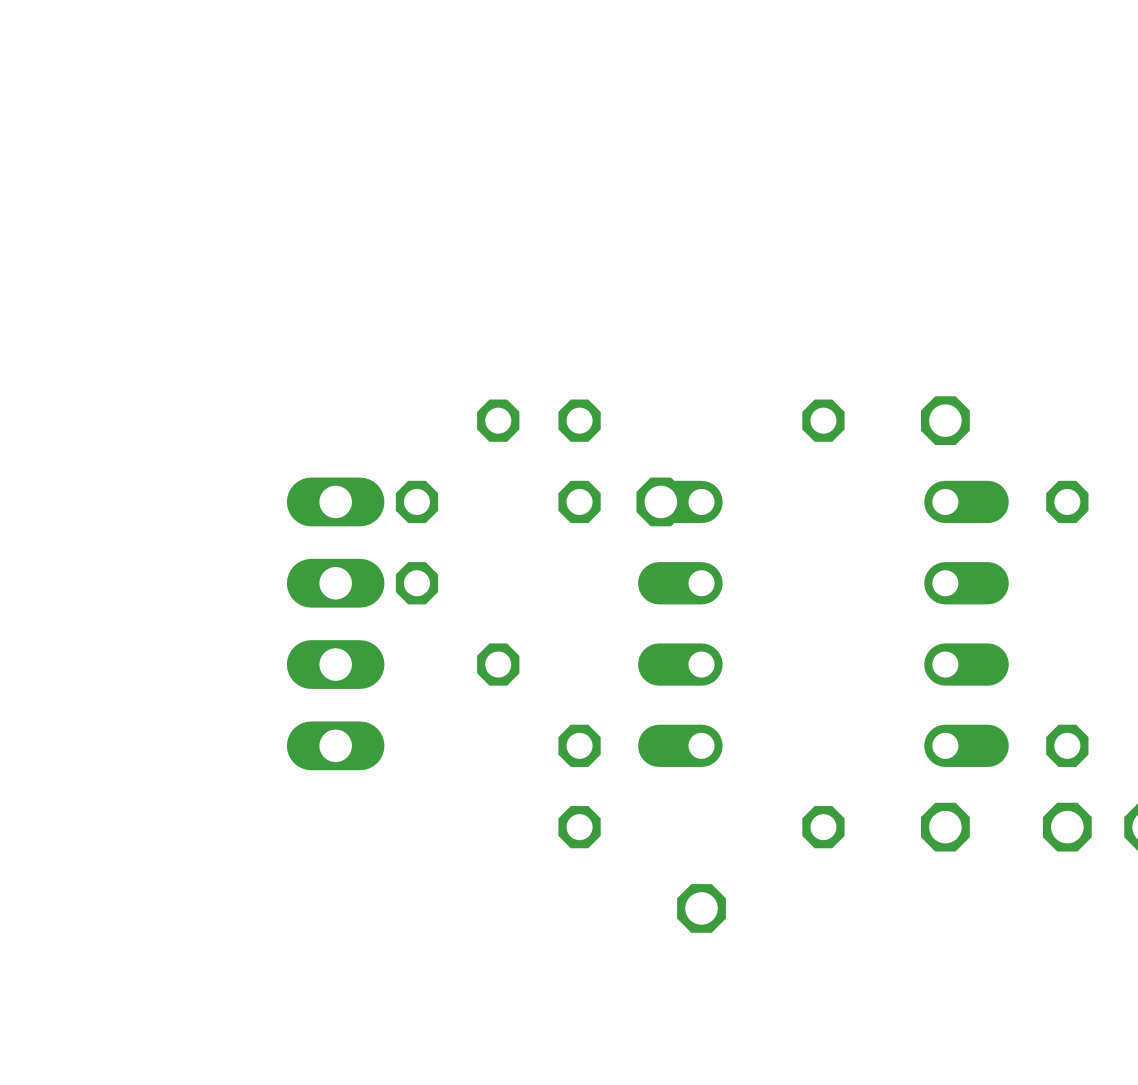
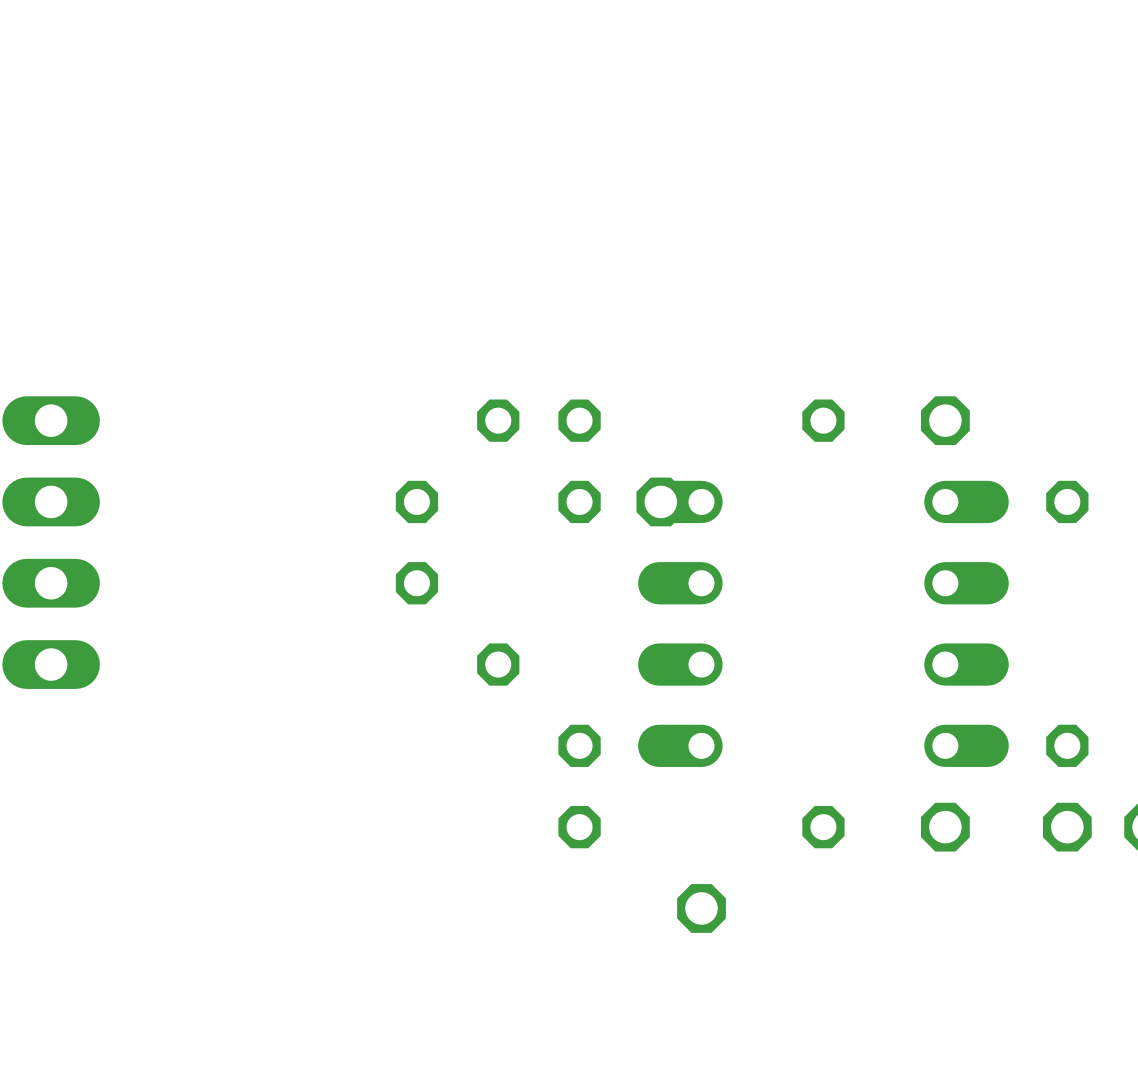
part position: (335, 623) -> (51, 542)

